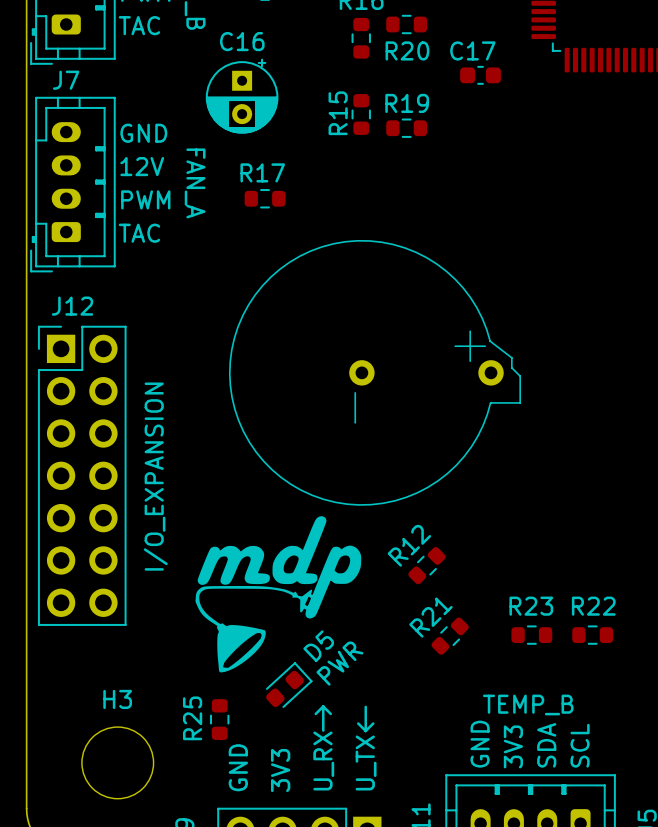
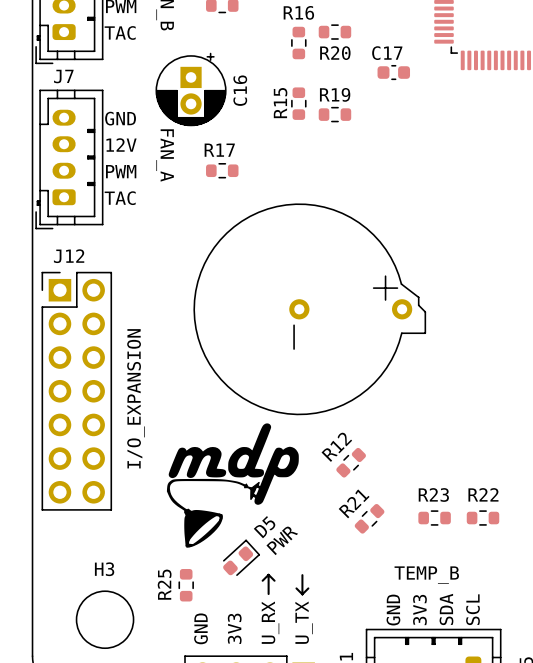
C16 name position: C16 (242, 41) -> C16 (240, 90)
C16 footprint: [205, 58, 279, 134] -> [155, 52, 227, 127]

